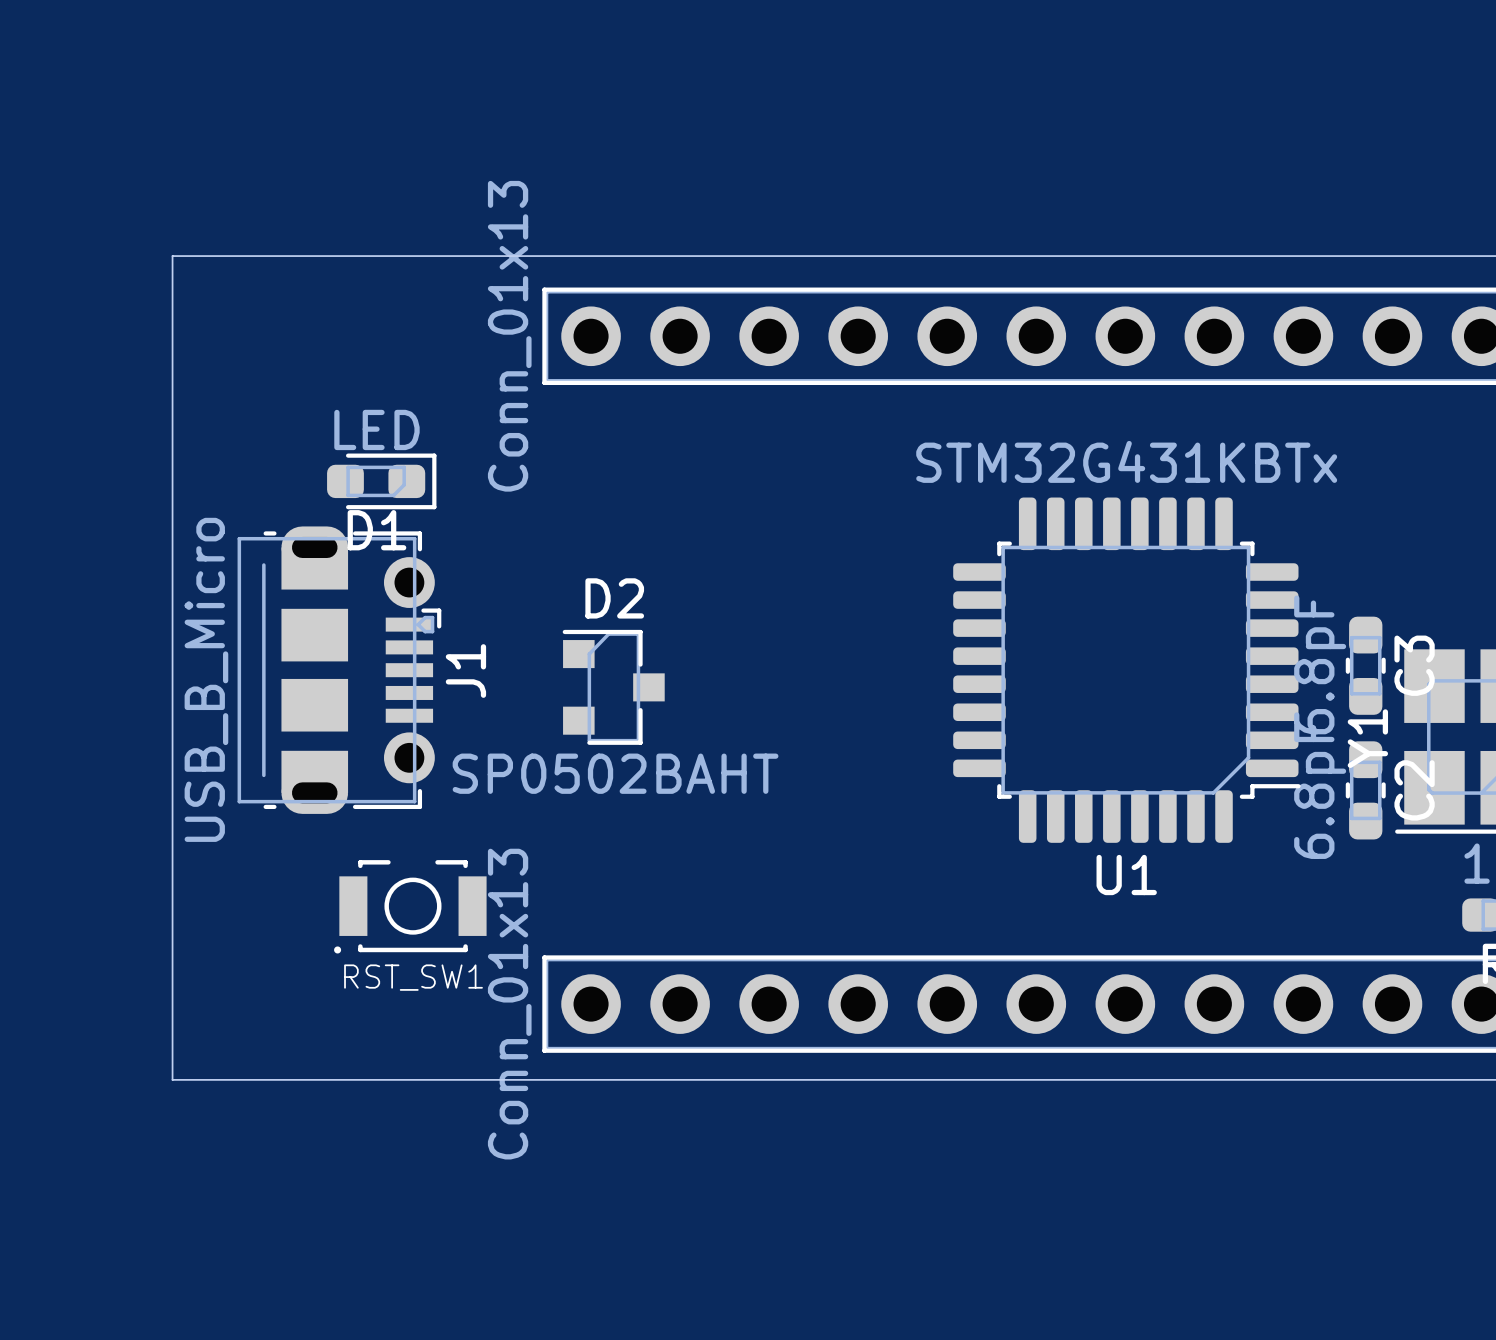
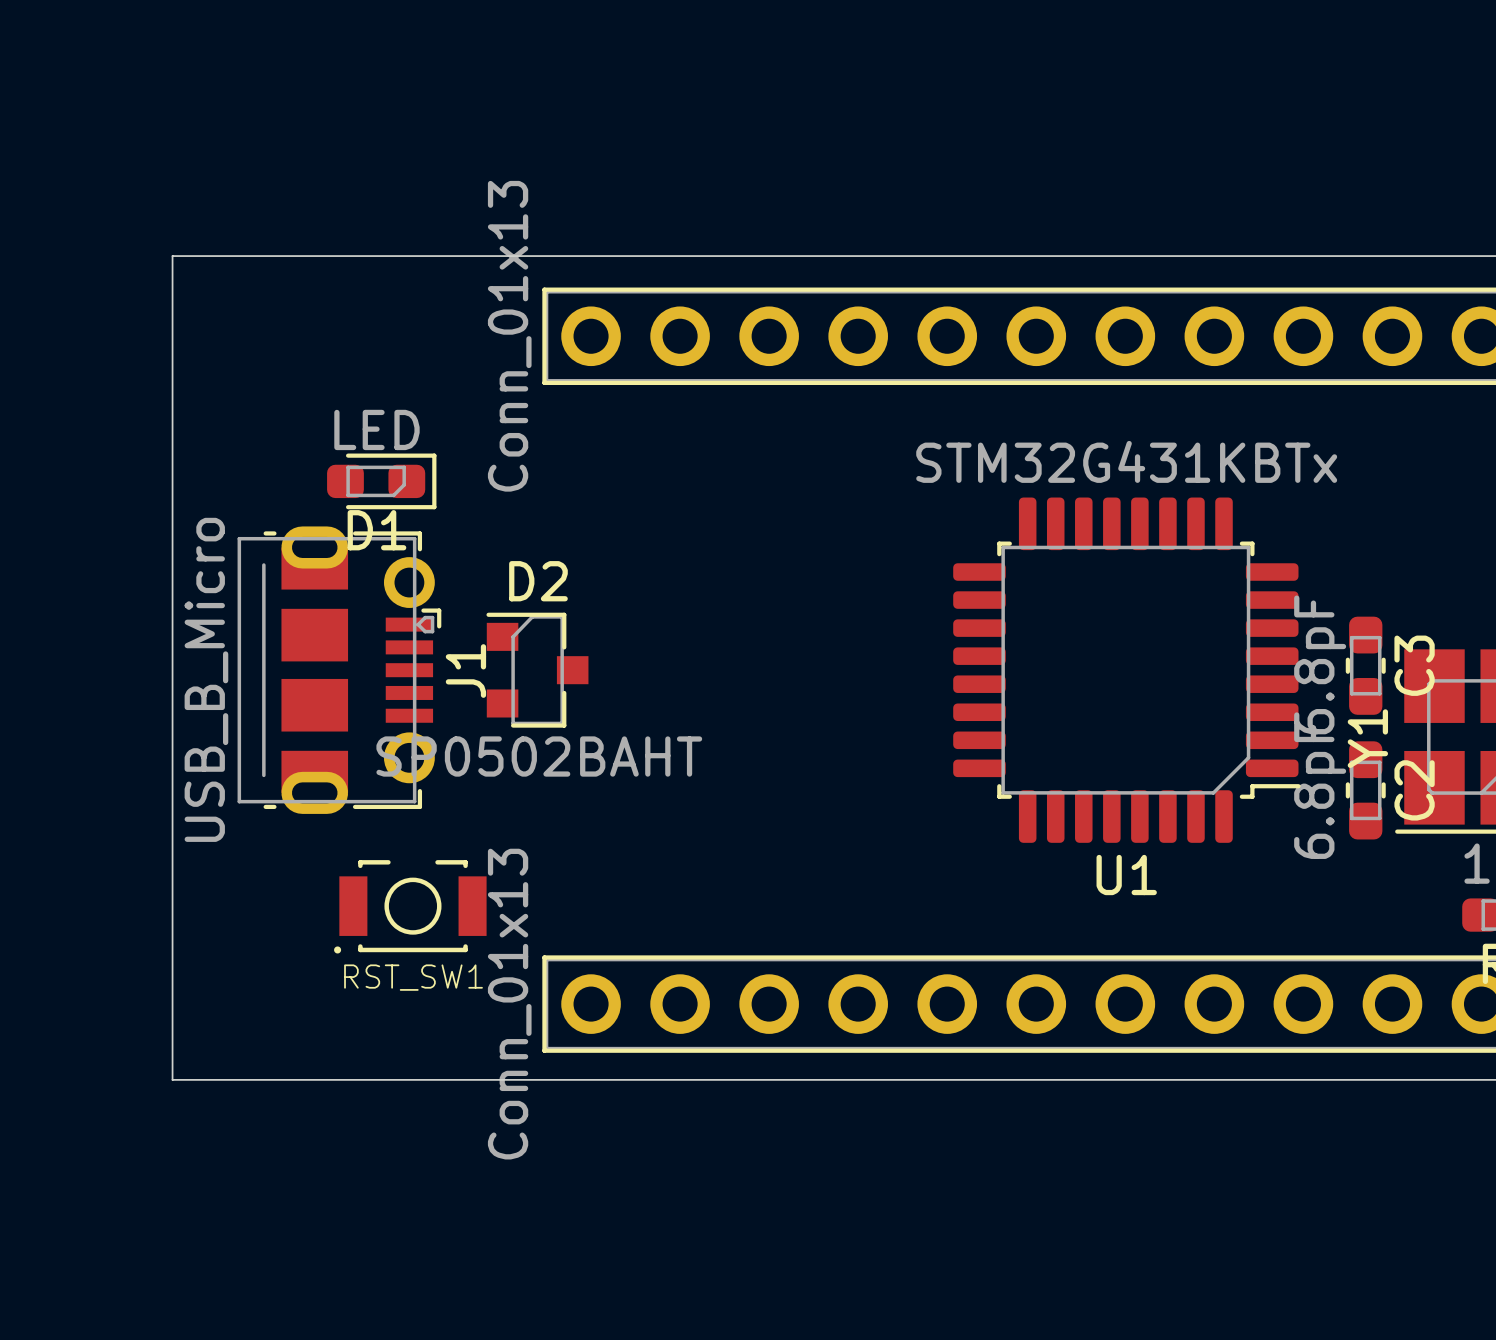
D2 position: (613, 687) -> (537, 670)

